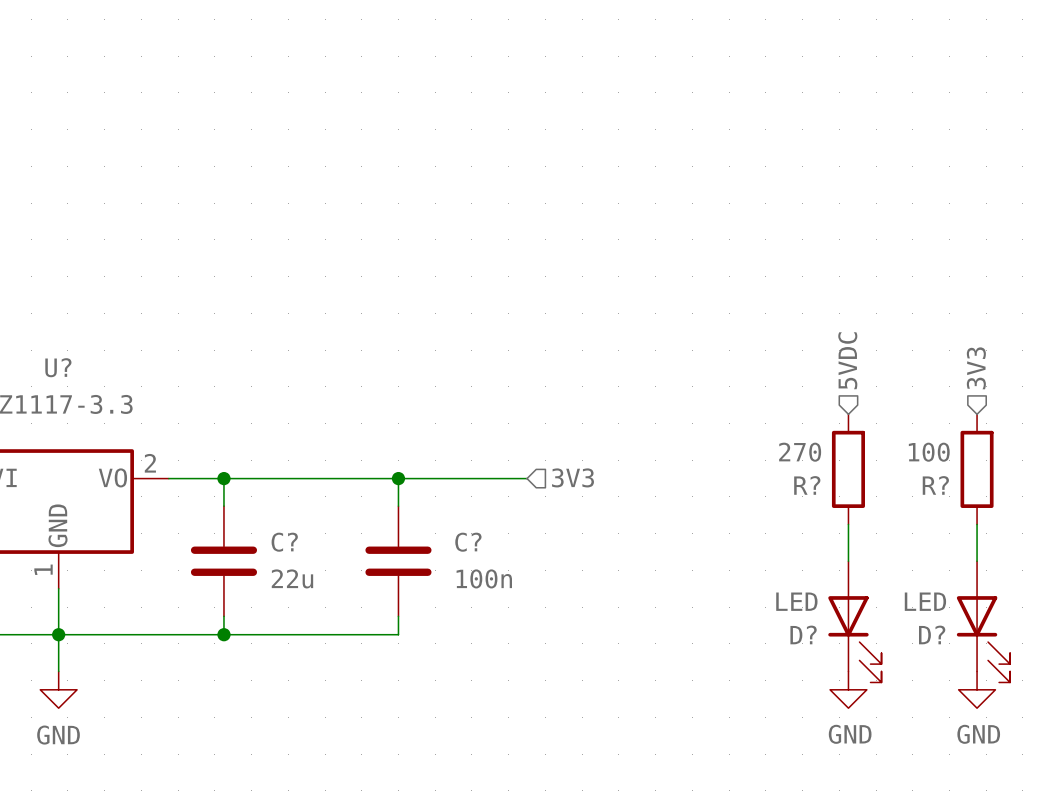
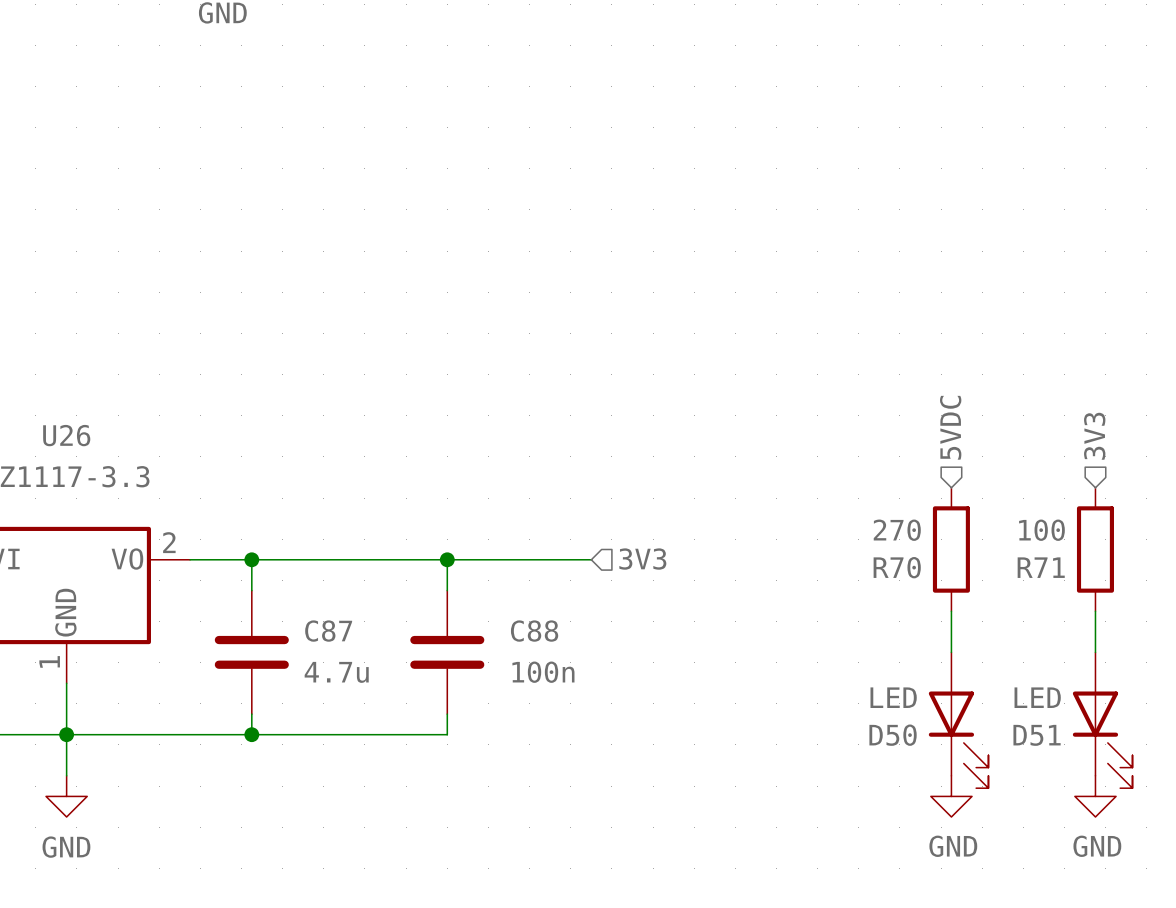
U? name: U? (58, 367) -> U26 (66, 435)
R? name: R? (807, 485) -> R70 (897, 567)
R? name: R? (935, 485) -> R71 (1041, 567)
C? name: C? (284, 542) -> C87 (328, 631)
C? name: C? (468, 542) -> C88 (534, 631)
C? value: 22u (292, 578) -> 4.7u (336, 672)
D? name: D? (803, 634) -> D50 (893, 735)
D? name: D? (932, 634) -> D51 (1037, 735)

